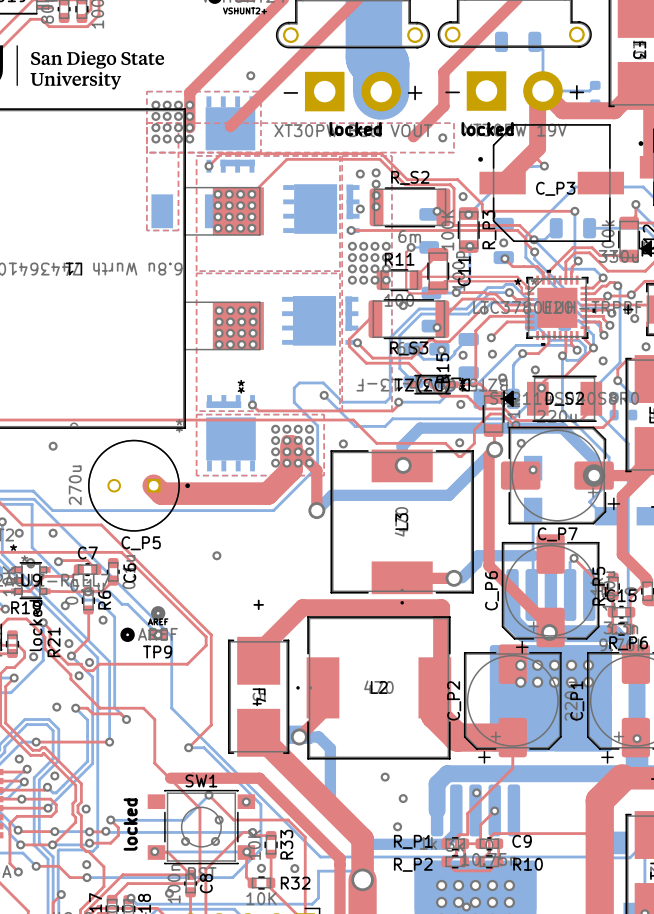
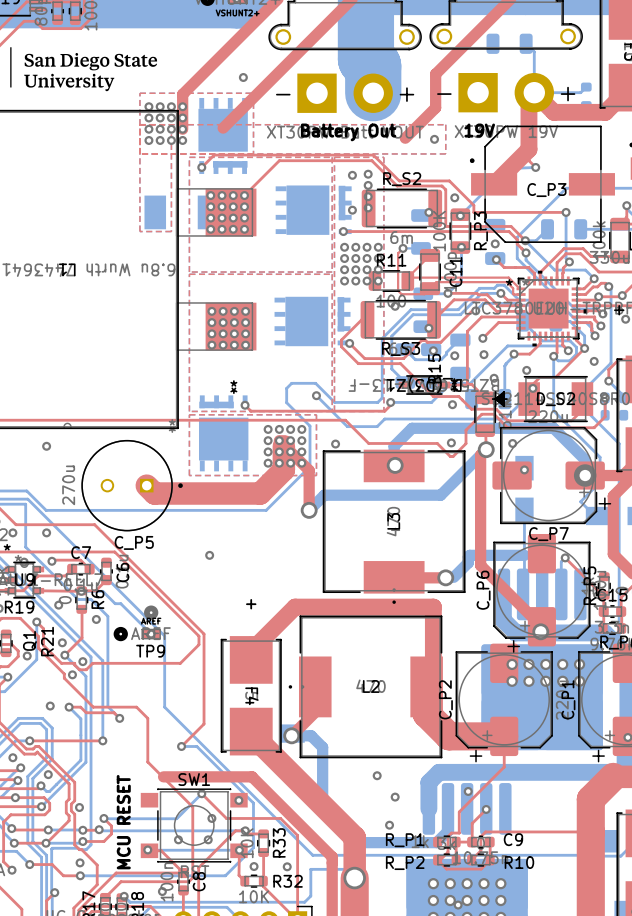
text: locked (355, 129) -> Battery Out (348, 132)
text: locked (487, 129) -> 19V (479, 130)
text: locked (35, 625) -> Q1 (29, 640)
text: locked (130, 824) -> MCU RESET (123, 822)

